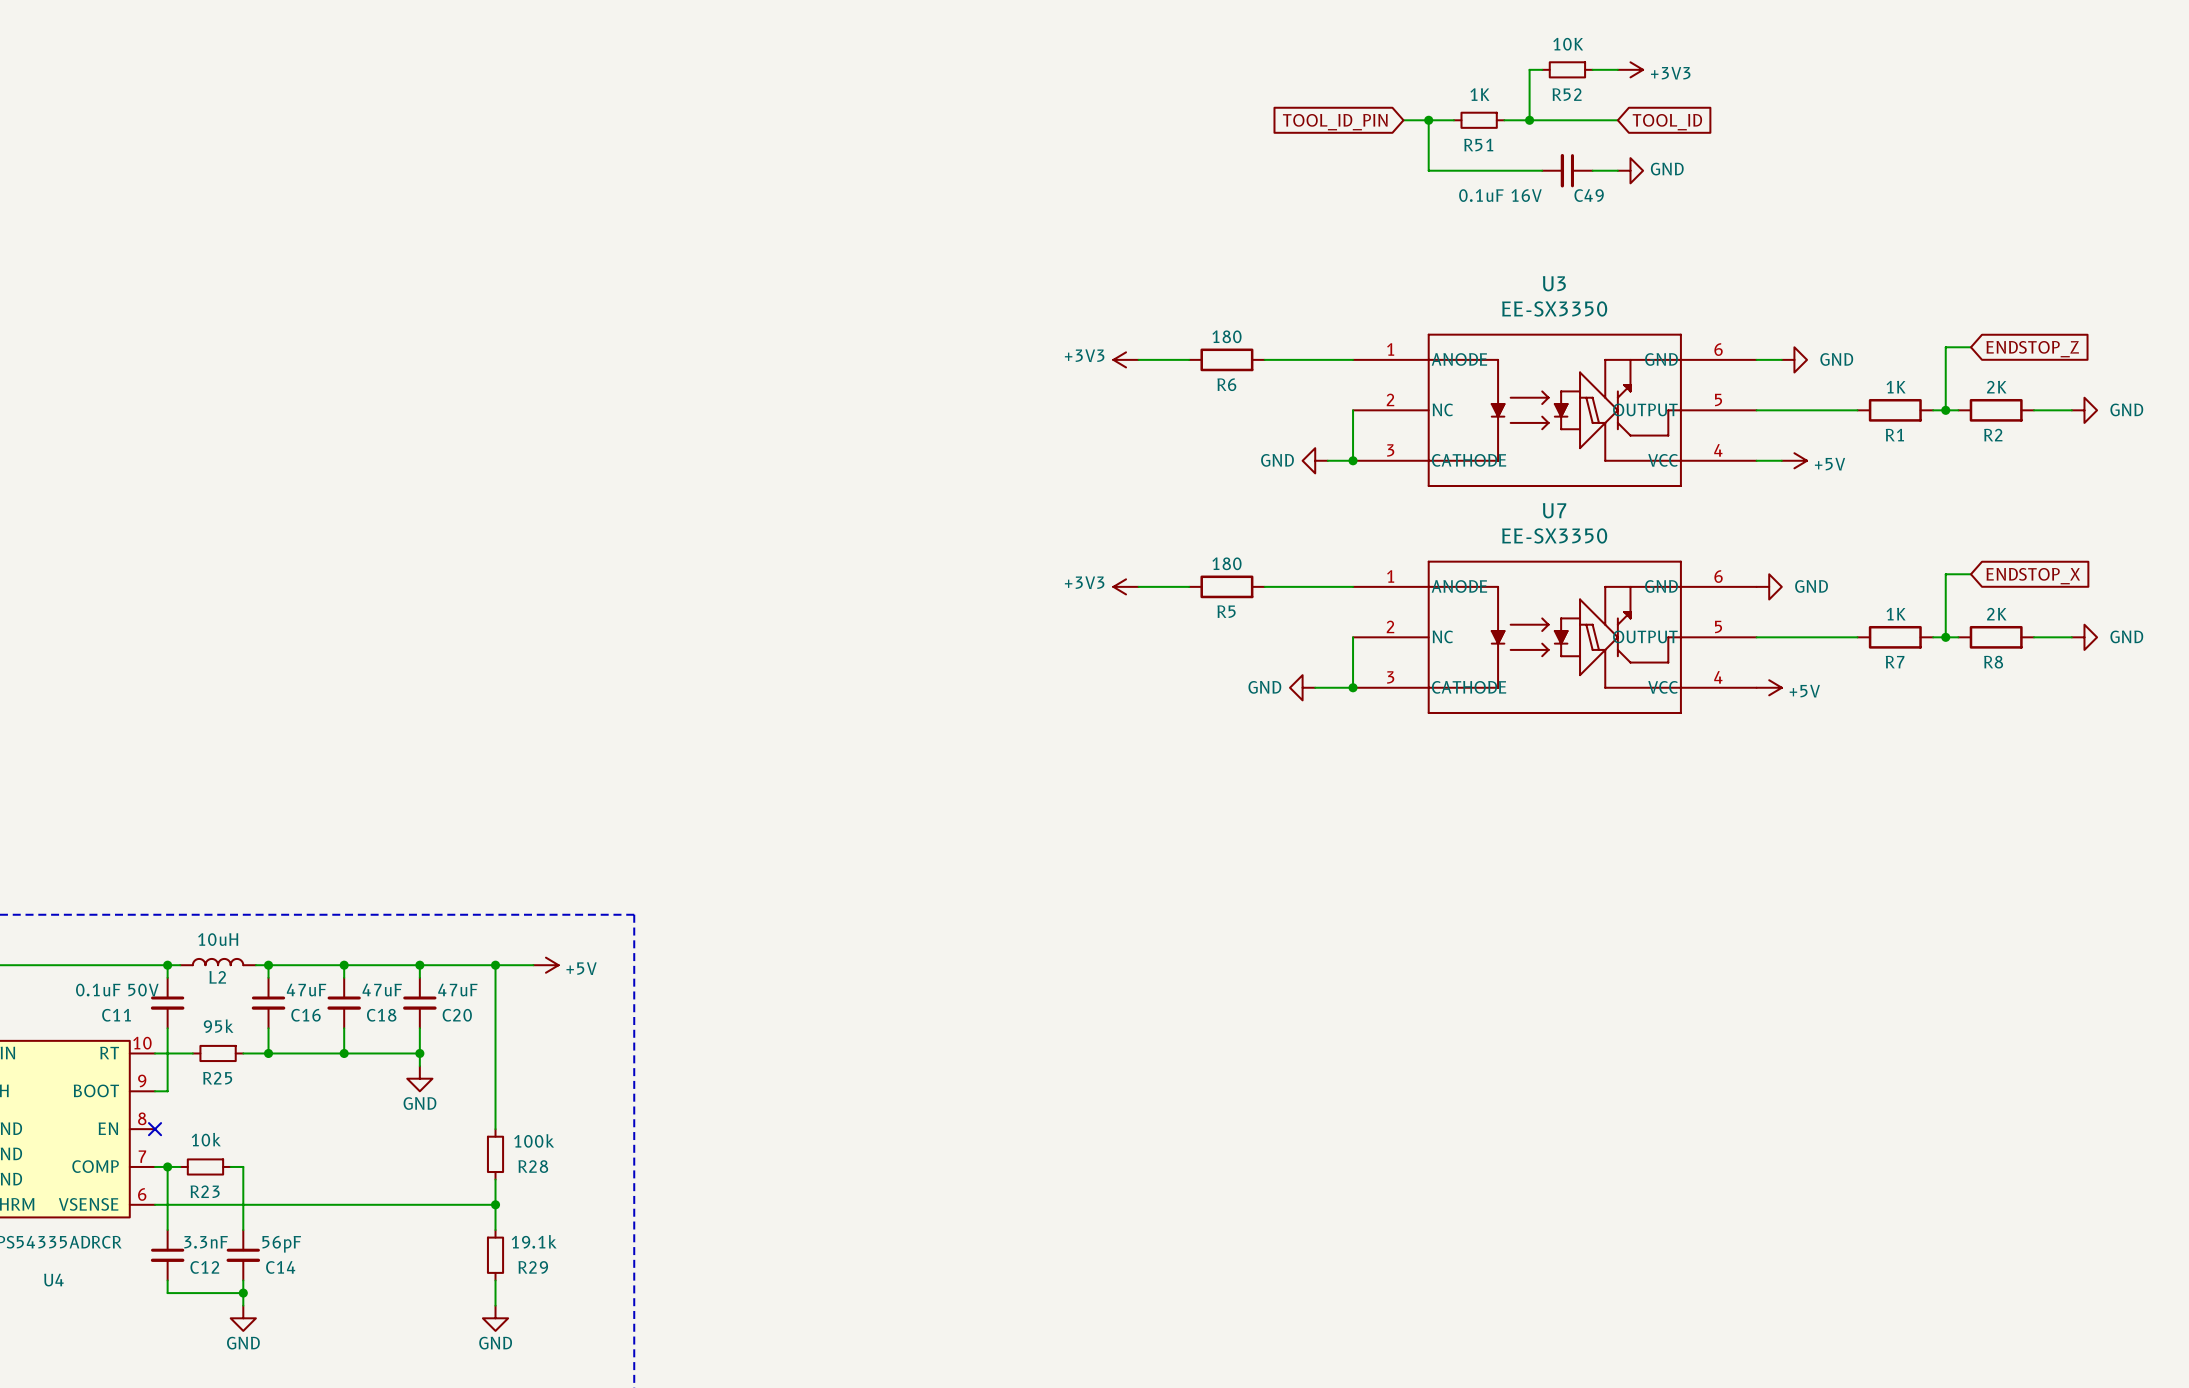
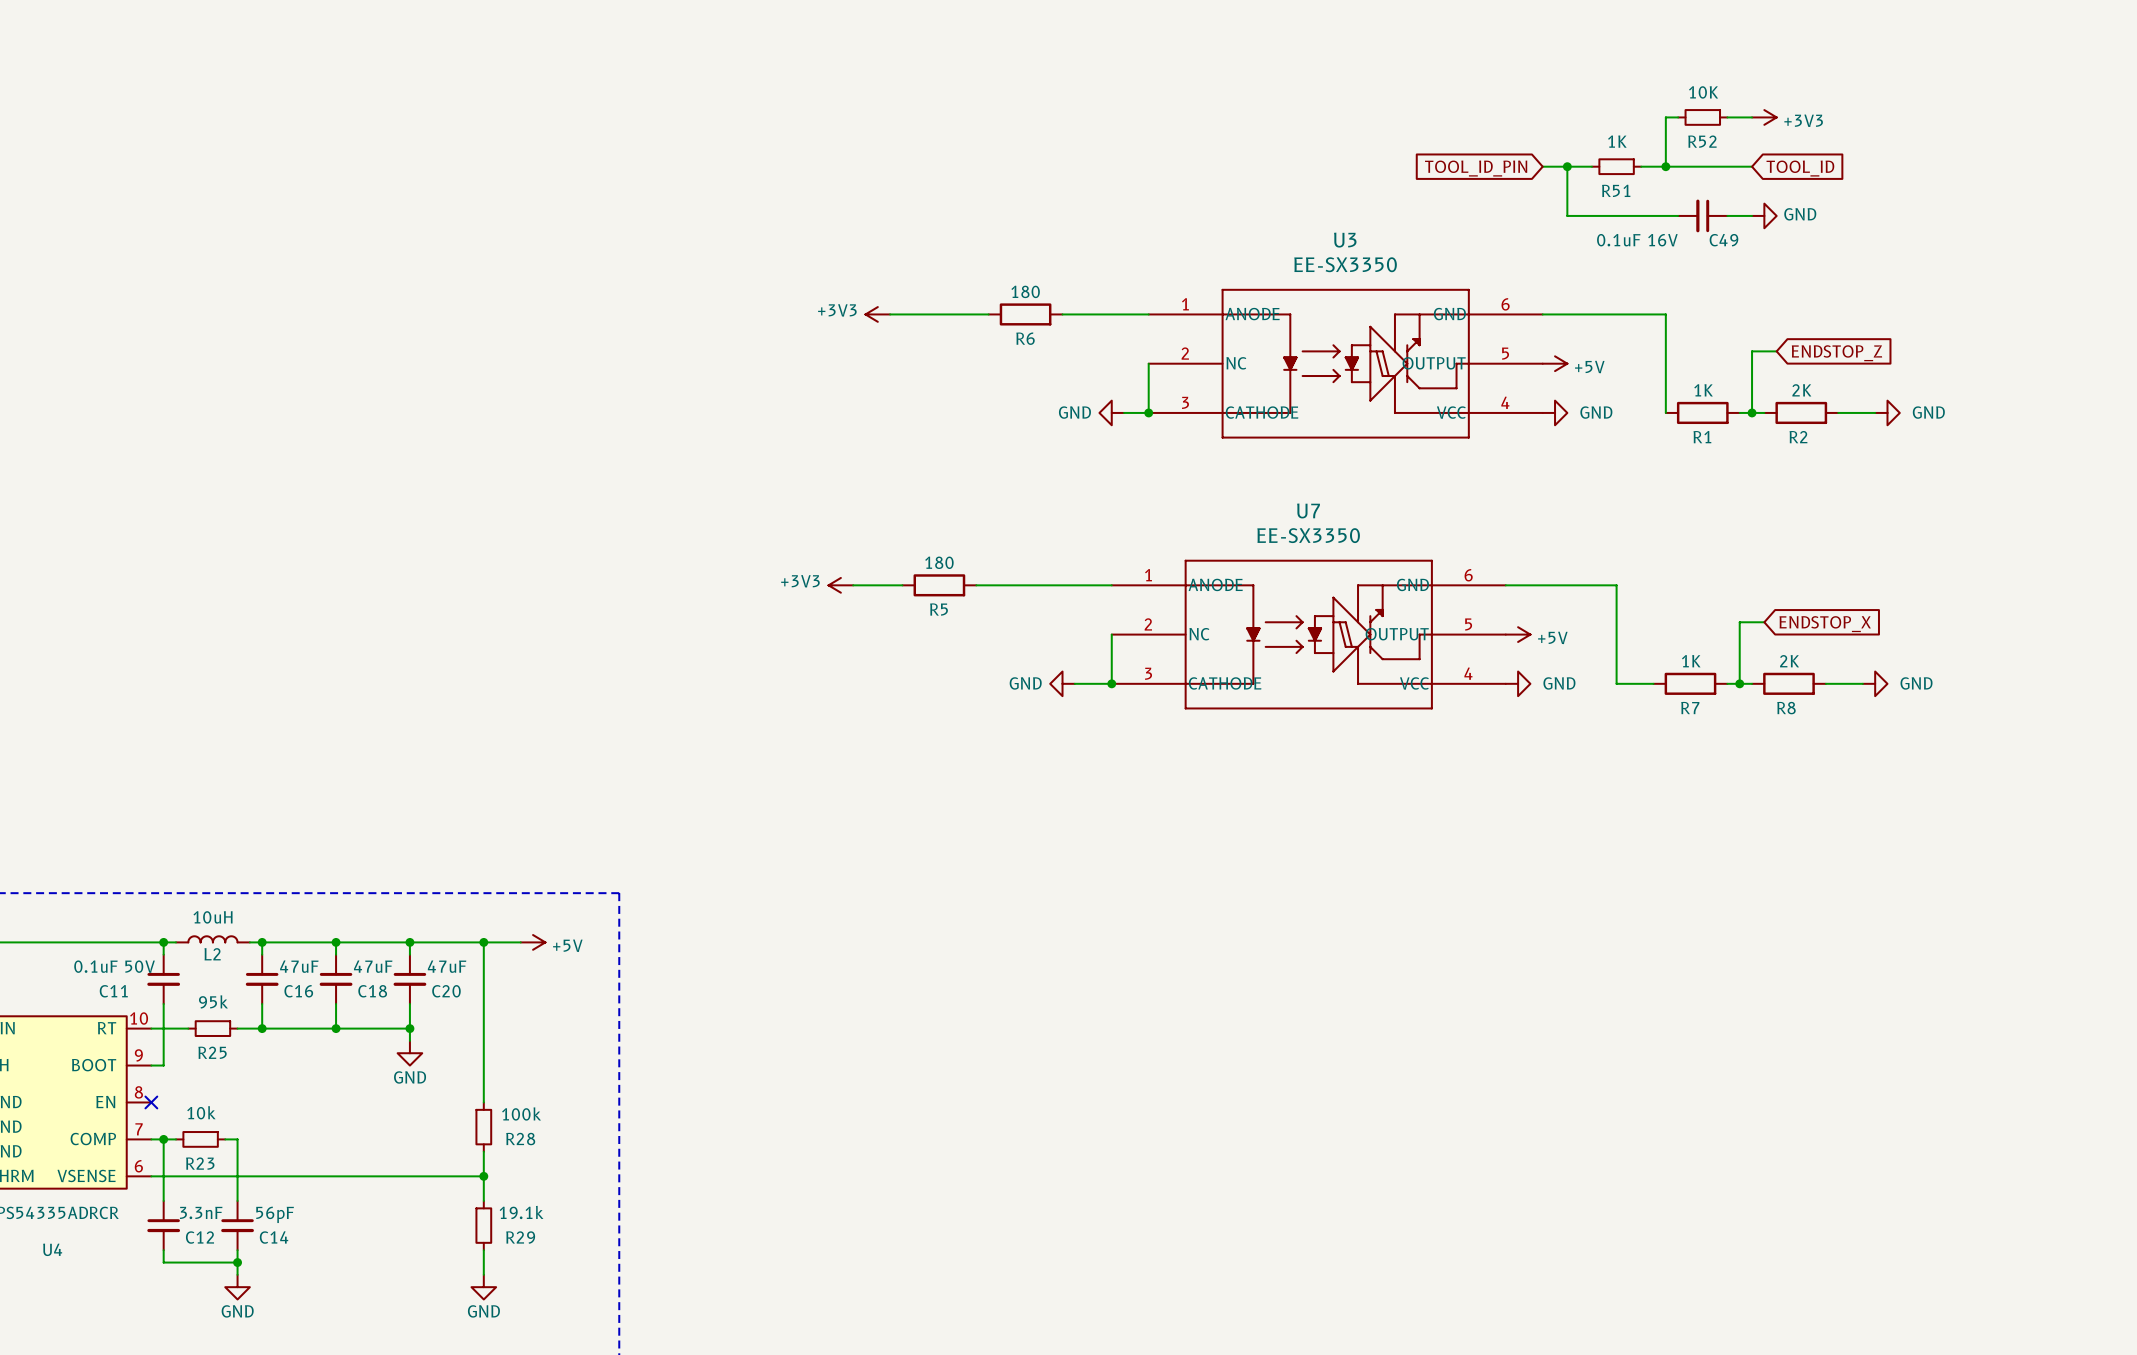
wire: (1542, 69) (1529, 69) (1529, 120) -> (1678, 117) (1665, 117) (1665, 166)
R52 position: (1567, 69) -> (1702, 117)
wire: (1592, 69) (1617, 69) -> (1727, 117) (1752, 117)
power symbol position: +3V3 (1630, 69) -> +3V3 (1764, 117)
wire: (1403, 120) (1453, 120) -> none
wire: (1428, 120) (1428, 170) (1542, 170) -> (1567, 166) (1567, 215) (1678, 215)
junction: (1428, 120) -> none
R51 position: (1479, 120) -> (1616, 166)
wire: (1504, 120) (1617, 120) -> (1641, 166) (1752, 166)
junction: (1529, 120) -> none
global label position: TOOL_ID_PIN (1335, 122) -> TOOL_ID_PIN (1476, 168)
global label position: TOOL_ID (1667, 122) -> TOOL_ID (1800, 168)
C49 position: (1567, 170) -> (1702, 215)
junction: none -> (1567, 166)
power symbol: GND (1630, 170) -> none
junction: none -> (1665, 166)
power symbol: none -> GND (1764, 215)
power symbol: none -> +3V3 (877, 314)
wire: none -> (890, 314) (988, 314)
wire: none -> (1542, 314) (1665, 314) (1665, 412)
wire: (1970, 347) (1945, 347) (1945, 410) -> (1776, 351) (1752, 351) (1752, 412)
global label position: ENDSTOP_Z (2032, 349) -> ENDSTOP_Z (1836, 353)
power symbol: +3V3 (1126, 359) -> none
wire: (1138, 359) (1189, 359) -> none
R6 position: (1226, 359) -> (1025, 314)
wire: (1264, 359) (1353, 359) -> (1062, 314) (1148, 314)
wire: (1756, 359) (1781, 359) -> none
power symbol: GND (1794, 359) -> none
power symbol: none -> +5V (1555, 363)
wire: (1353, 410) (1353, 460) (1327, 460) -> (1148, 363) (1148, 412) (1124, 412)
U3 position: (1554, 410) -> (1345, 363)
wire: (1756, 410) (1857, 410) -> none
R1 position: (1895, 410) -> (1702, 412)
wire: (1933, 410) (1958, 410) -> (1739, 412) (1764, 412)
junction: (1945, 410) -> none
R2 position: (1996, 410) -> (1801, 412)
wire: (2034, 410) (2071, 410) -> (1838, 412) (1875, 412)
power symbol: GND (2084, 410) -> none
power symbol: none -> GND (1111, 412)
junction: none -> (1148, 412)
power symbol: none -> GND (1555, 412)
junction: none -> (1752, 412)
power symbol: none -> GND (1887, 412)
power symbol: GND (1315, 460) -> none
junction: (1353, 460) -> none
wire: (1756, 460) (1781, 460) -> (1727, 215) (1752, 215)
power symbol: +5V (1794, 460) -> none
wire: (1970, 574) (1945, 574) (1945, 637) -> none
global label position: ENDSTOP_X (2033, 576) -> ENDSTOP_X (1825, 624)
power symbol: +3V3 (1126, 586) -> none
wire: (1138, 586) (1189, 586) -> none
R5 position: (1226, 586) -> (939, 585)
wire: (1264, 586) (1353, 586) -> none
power symbol: GND (1769, 586) -> none
power symbol: none -> +3V3 (840, 585)
wire: none -> (853, 585) (902, 585)
wire: none -> (976, 585) (1111, 585)
wire: none -> (1505, 585) (1616, 585) (1616, 683) (1653, 683)
wire: (1353, 637) (1353, 687) (1315, 687) -> (1111, 634) (1111, 683) (1074, 683)
U7 position: (1554, 637) -> (1308, 634)
wire: (1756, 637) (1781, 637) -> (1739, 683) (1739, 622)
wire: (1807, 637) (1857, 637) -> none
R7 position: (1895, 637) -> (1690, 683)
wire: (1933, 637) (1958, 637) -> (1727, 683) (1752, 683)
junction: (1945, 637) -> none
R8 position: (1996, 637) -> (1788, 683)
wire: (2034, 637) (2071, 637) -> (1825, 683) (1862, 683)
power symbol: GND (2084, 637) -> none
power symbol: none -> +5V (1518, 634)
power symbol: GND (1302, 687) -> none
junction: (1353, 687) -> none
power symbol: +5V (1769, 687) -> none
power symbol: none -> GND (1062, 683)
junction: none -> (1111, 683)
power symbol: none -> GND (1518, 683)
junction: none -> (1739, 683)
power symbol: none -> GND (1875, 683)

